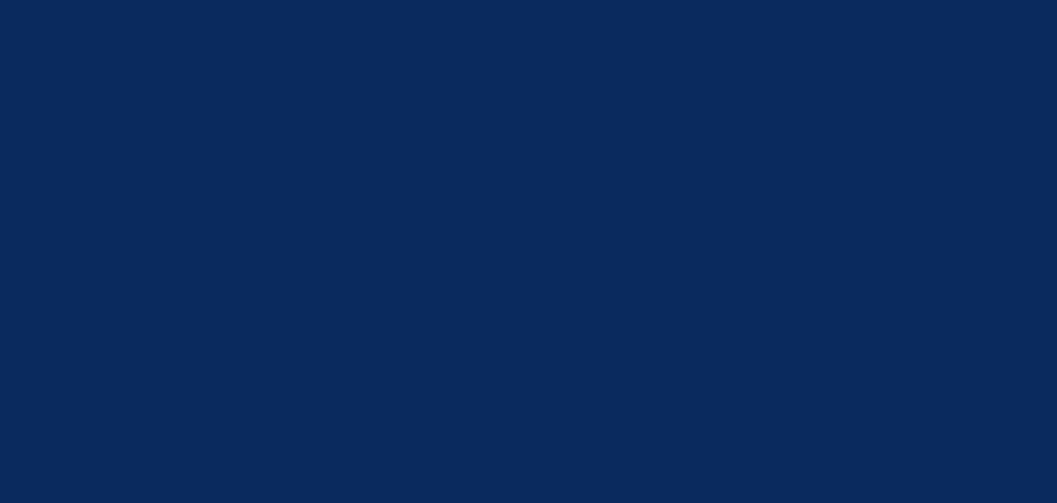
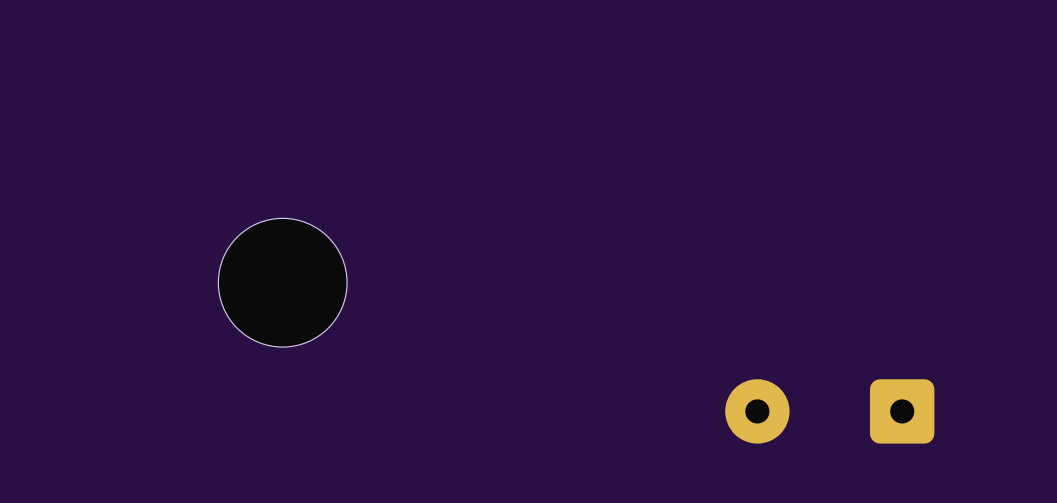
part: none -> (282, 282)
part: none -> (829, 411)

